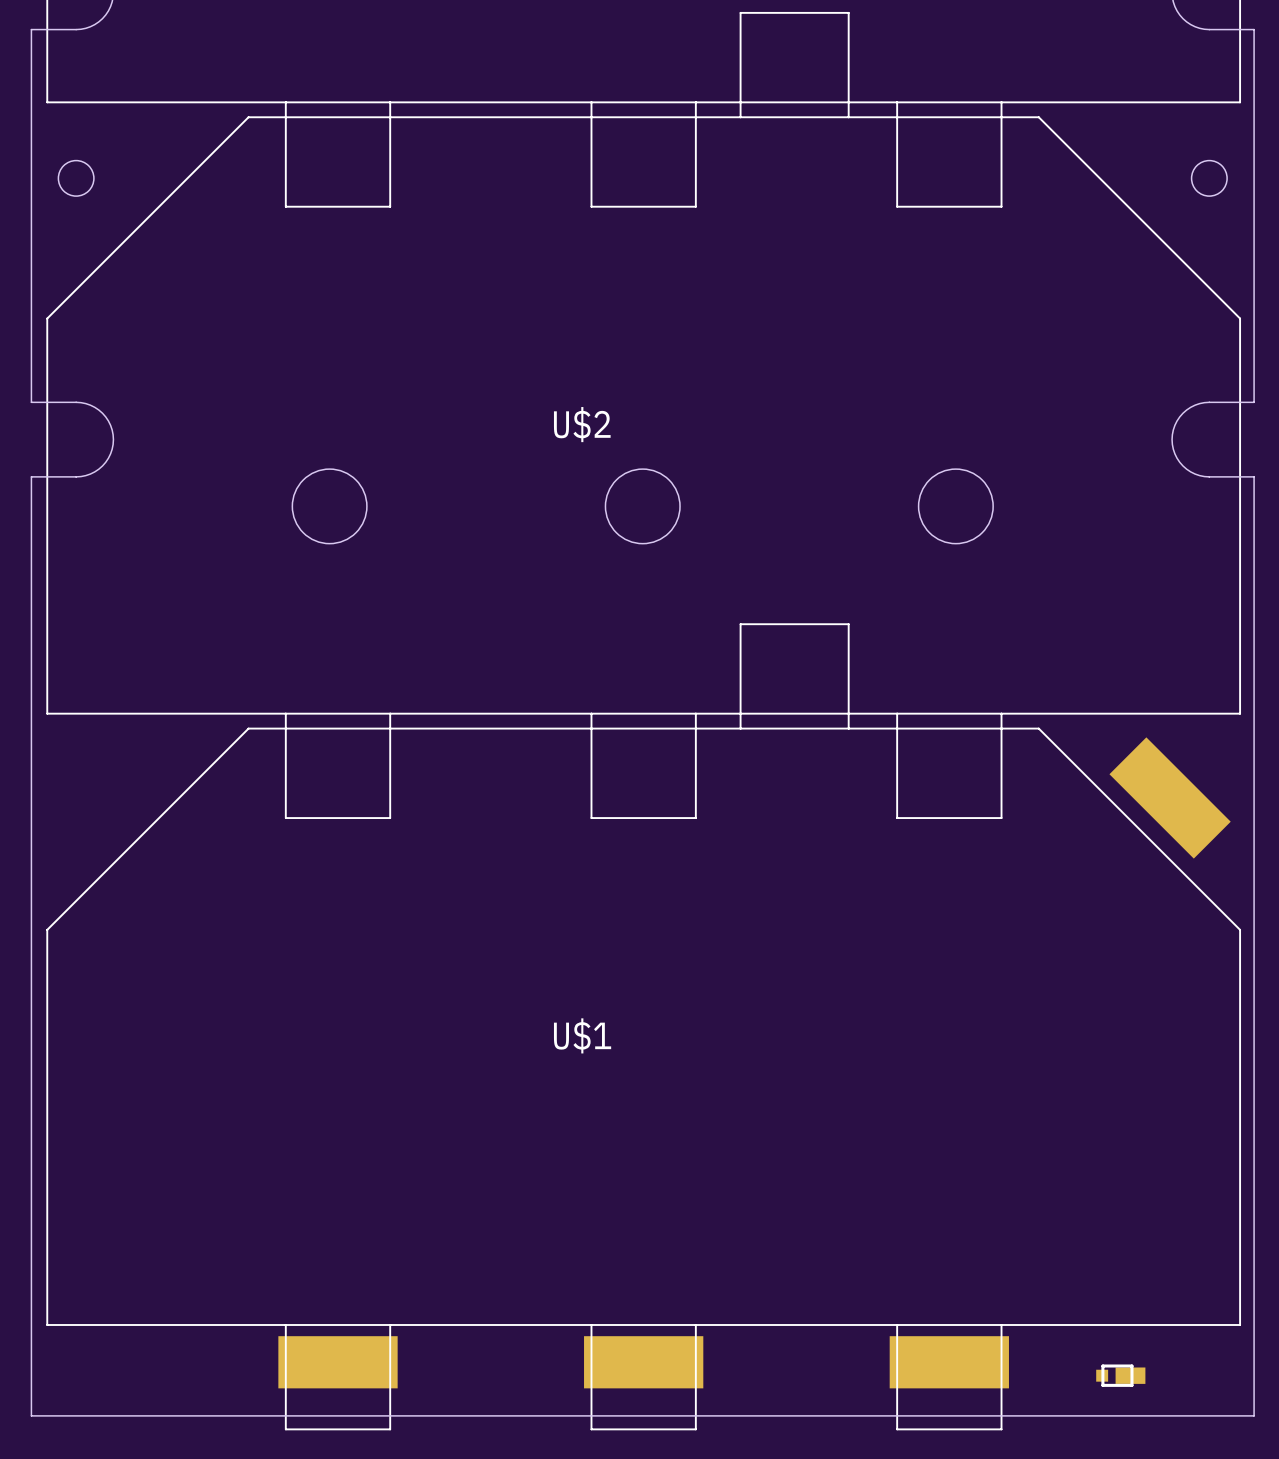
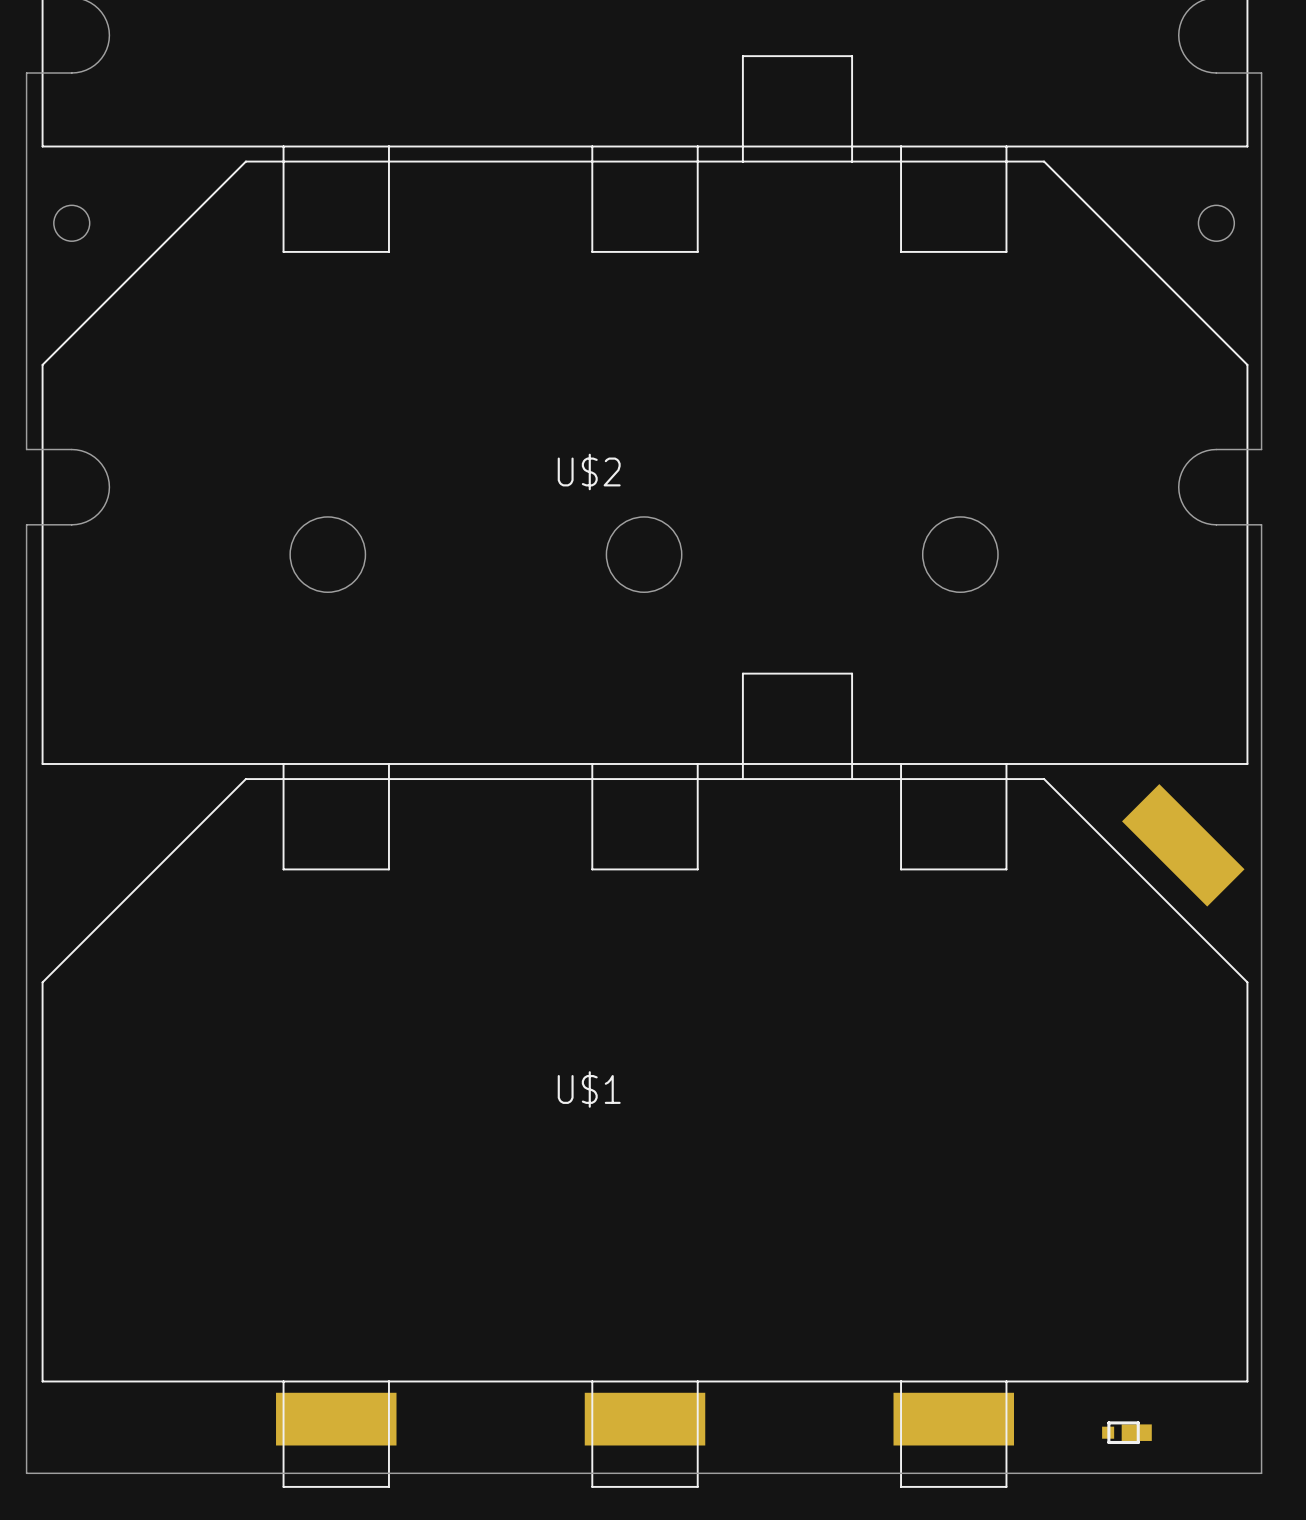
U$1 footprint: [46, 623, 1242, 1431] -> [41, 672, 1249, 1488]

